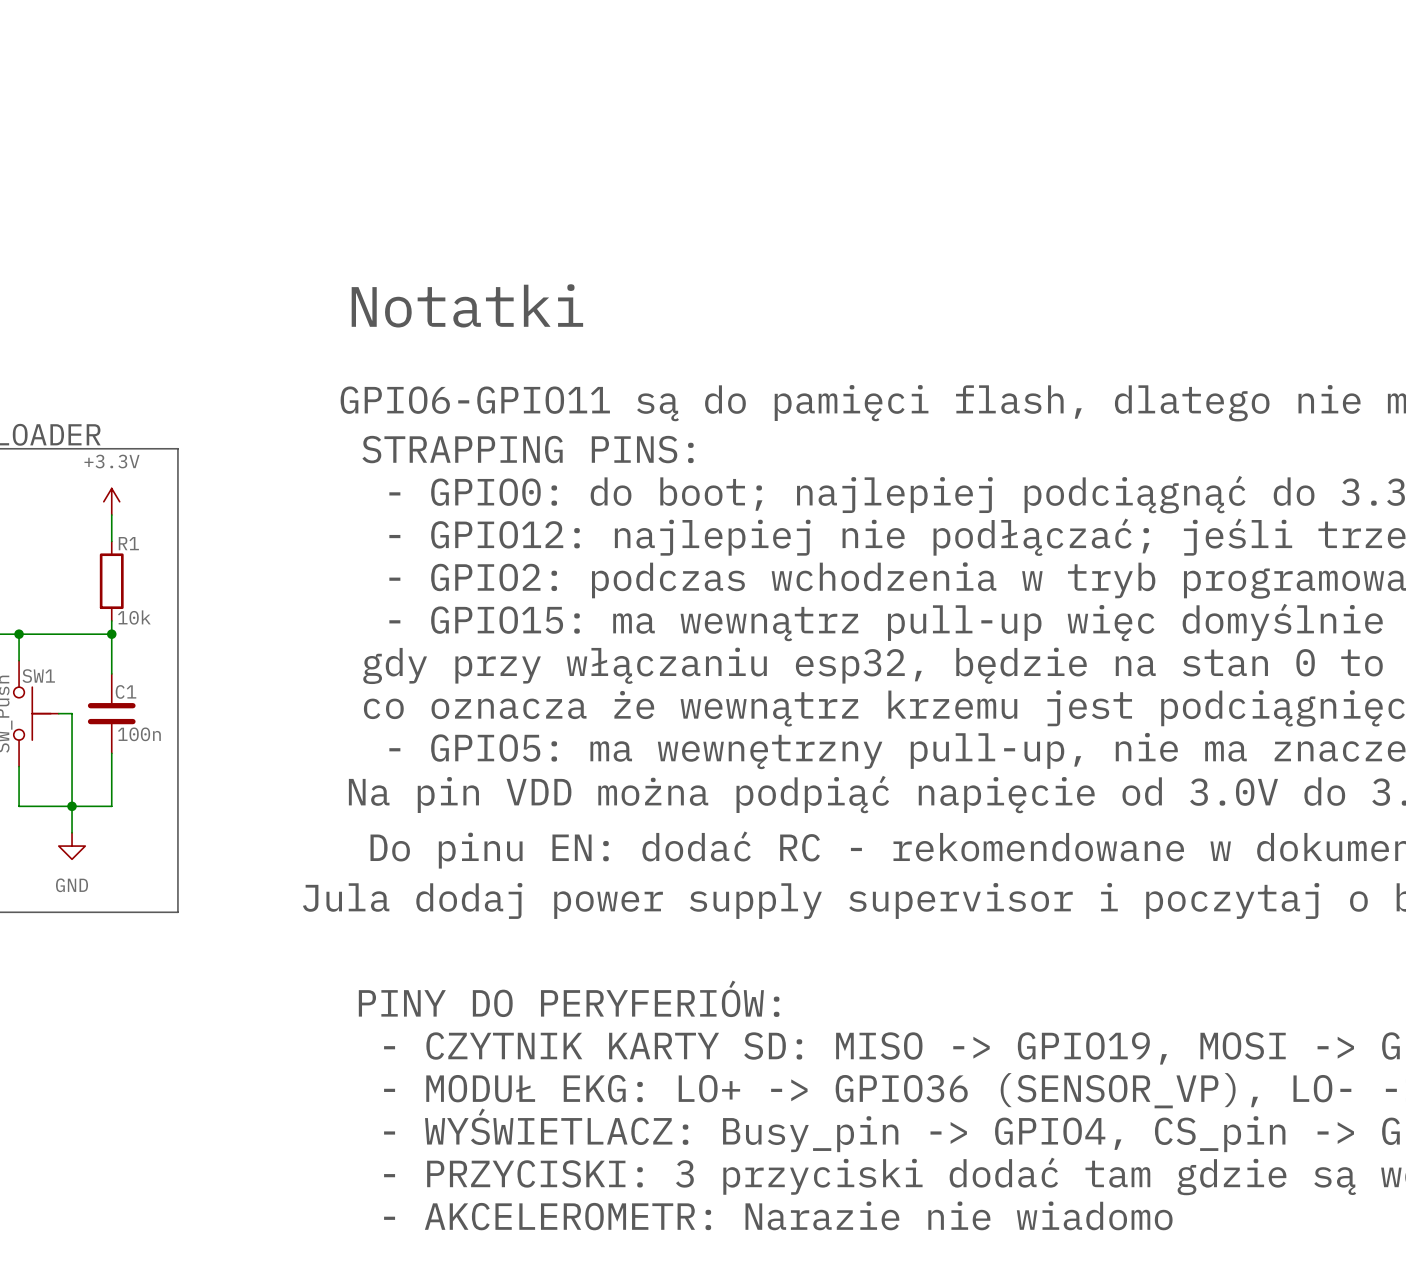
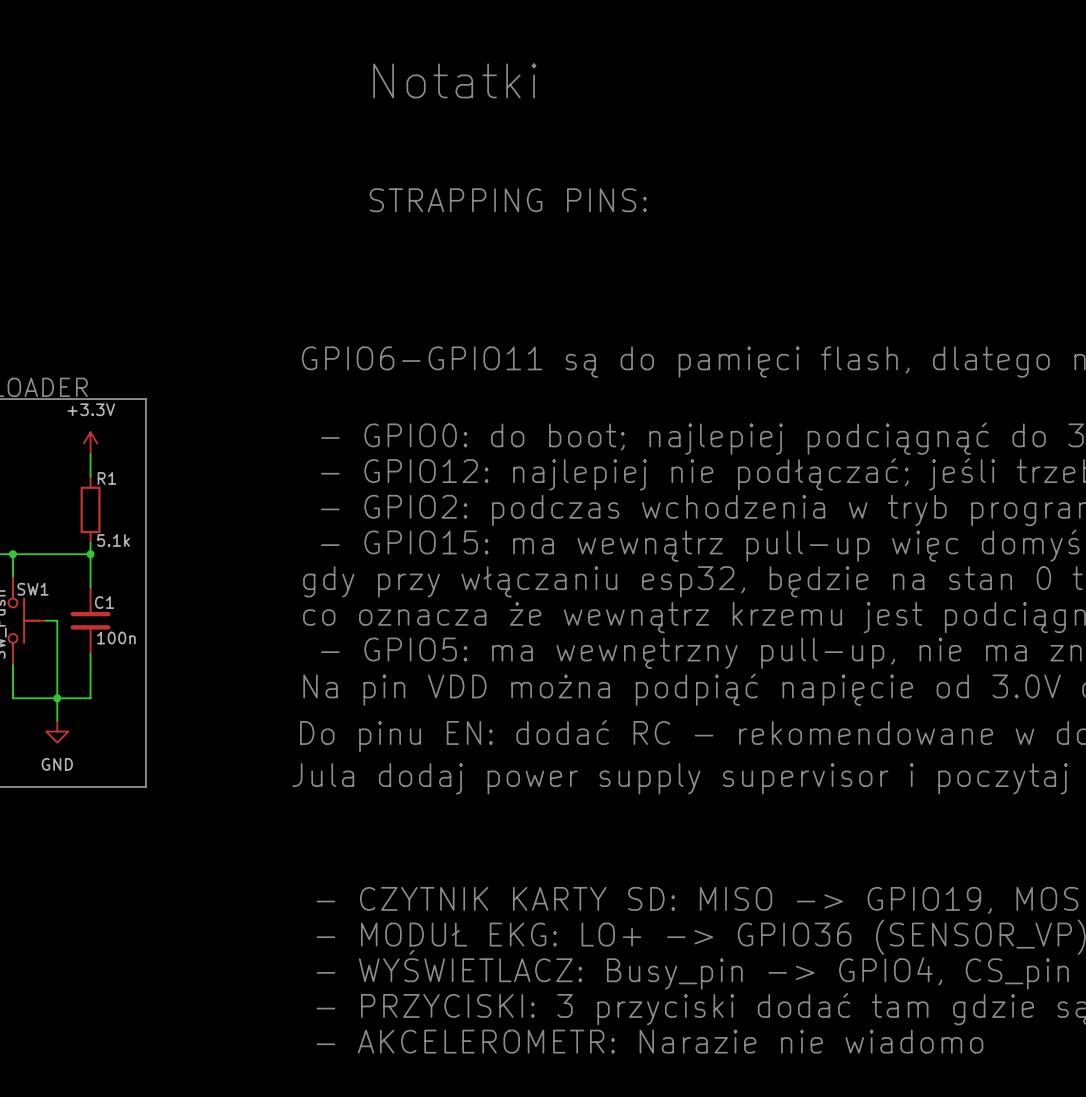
text position: Notatki (467, 305) -> Notatki (454, 80)
text position: STRAPPING PINS: (528, 449) -> STRAPPING PINS: (508, 200)
R1 value: 10k (134, 617) -> 5.1k (113, 540)
text: PINY DO PERYFERIÓW: (569, 998) -> none

